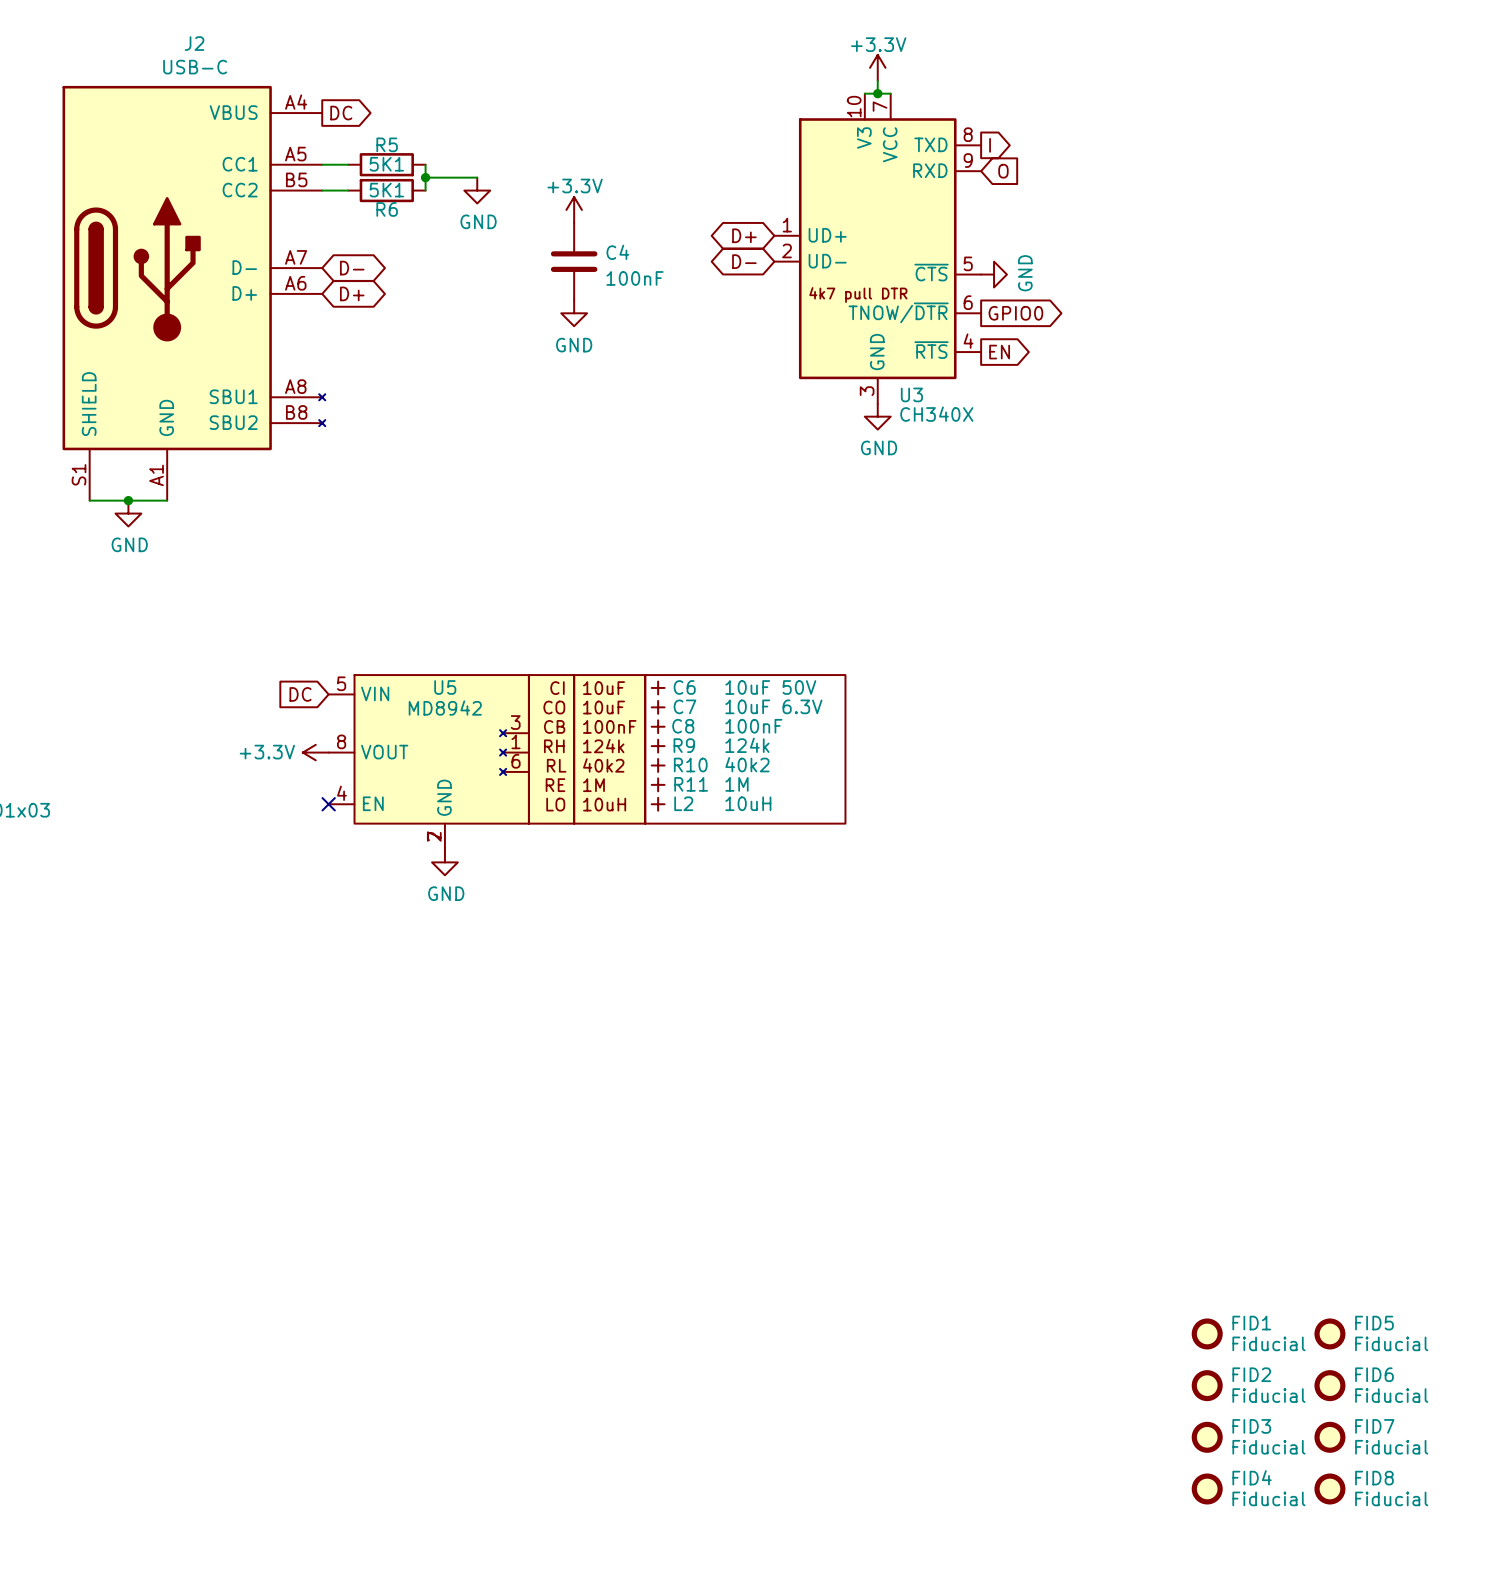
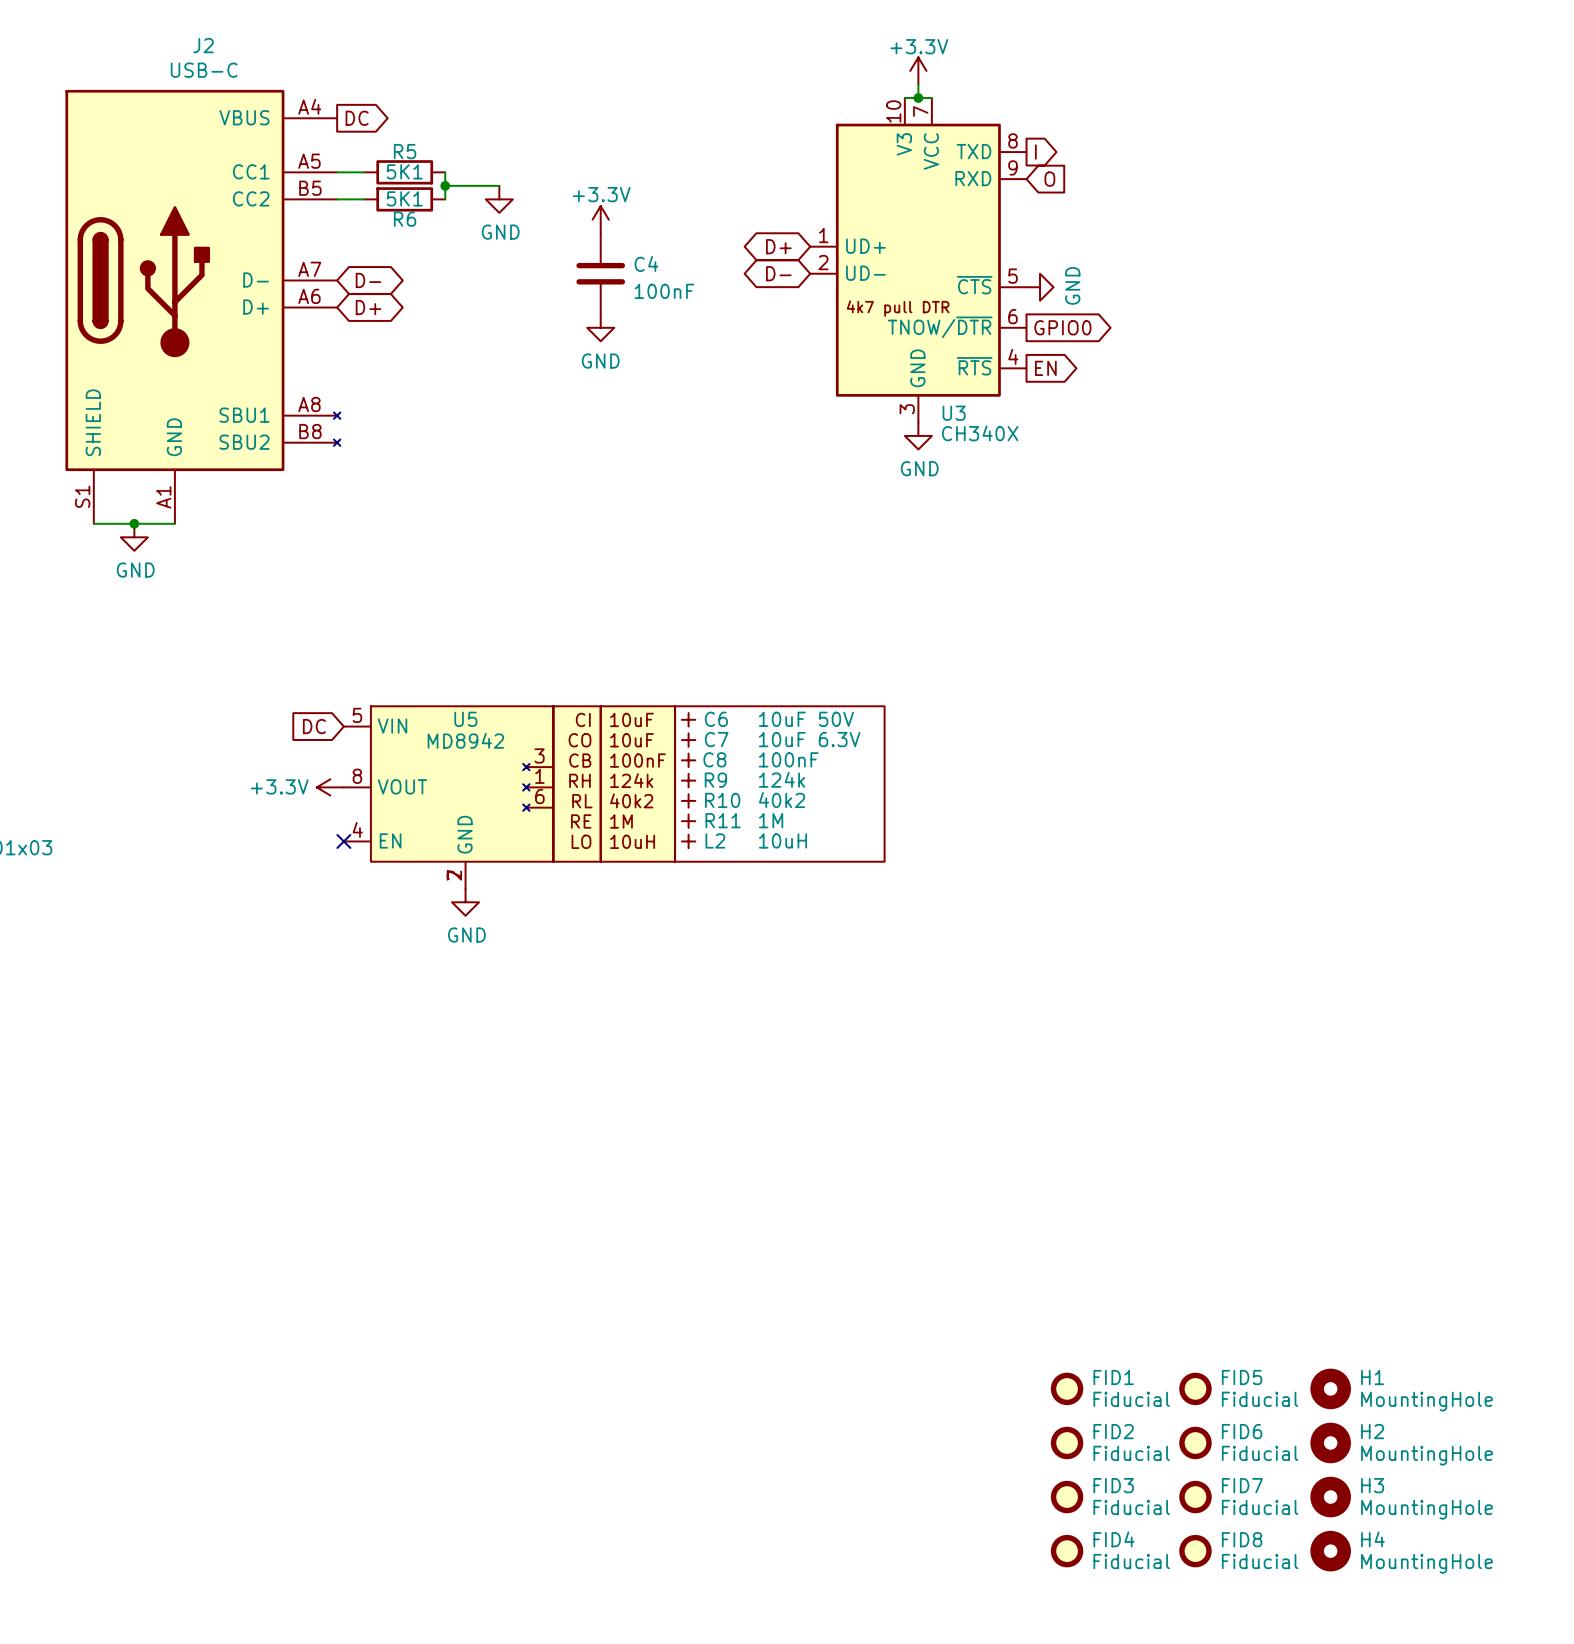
H1: none -> MountingHole (1330, 1388)
FID1 position: (1207, 1333) -> (1067, 1388)
FID5 position: (1329, 1333) -> (1195, 1388)
H2: none -> MountingHole (1330, 1442)
FID2 position: (1207, 1385) -> (1067, 1442)
FID6 position: (1329, 1385) -> (1195, 1442)
H3: none -> MountingHole (1330, 1497)
FID3 position: (1207, 1437) -> (1067, 1497)
FID7 position: (1329, 1437) -> (1195, 1497)
H4: none -> MountingHole (1330, 1551)
FID4 position: (1207, 1488) -> (1067, 1551)
FID8 position: (1329, 1488) -> (1195, 1551)

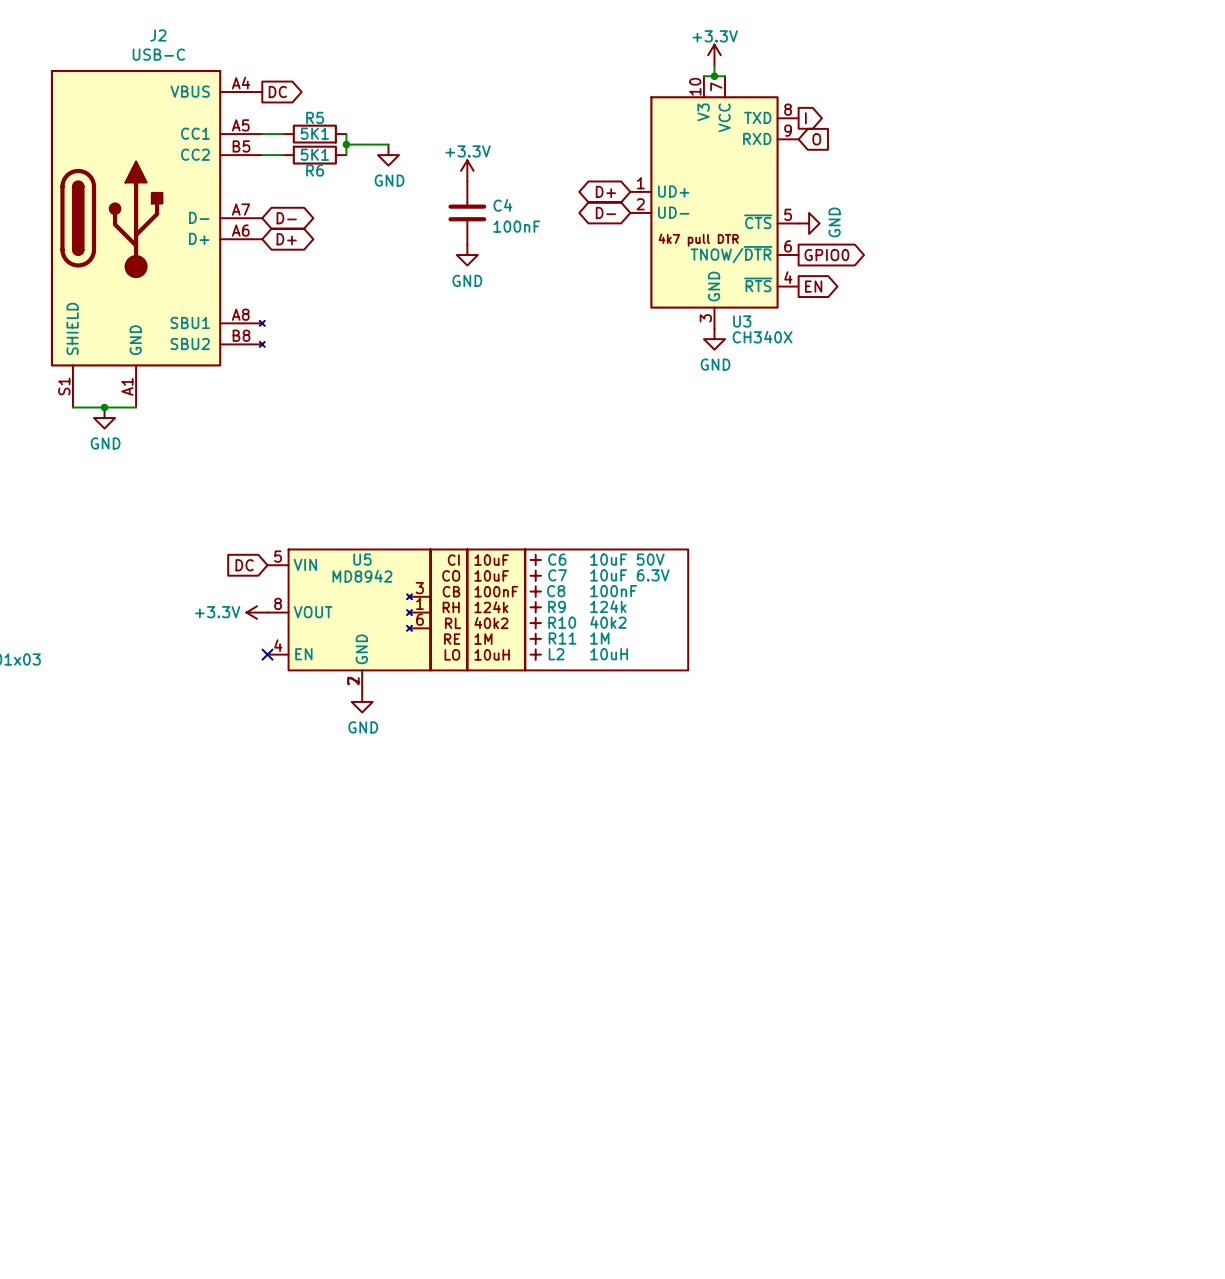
FID1: Fiducial (1067, 1388) -> none
FID5: Fiducial (1195, 1388) -> none
H1: MountingHole (1330, 1388) -> none
FID2: Fiducial (1067, 1442) -> none
FID6: Fiducial (1195, 1442) -> none
H2: MountingHole (1330, 1442) -> none
FID3: Fiducial (1067, 1497) -> none
FID7: Fiducial (1195, 1497) -> none
H3: MountingHole (1330, 1497) -> none
FID4: Fiducial (1067, 1551) -> none
FID8: Fiducial (1195, 1551) -> none
H4: MountingHole (1330, 1551) -> none

